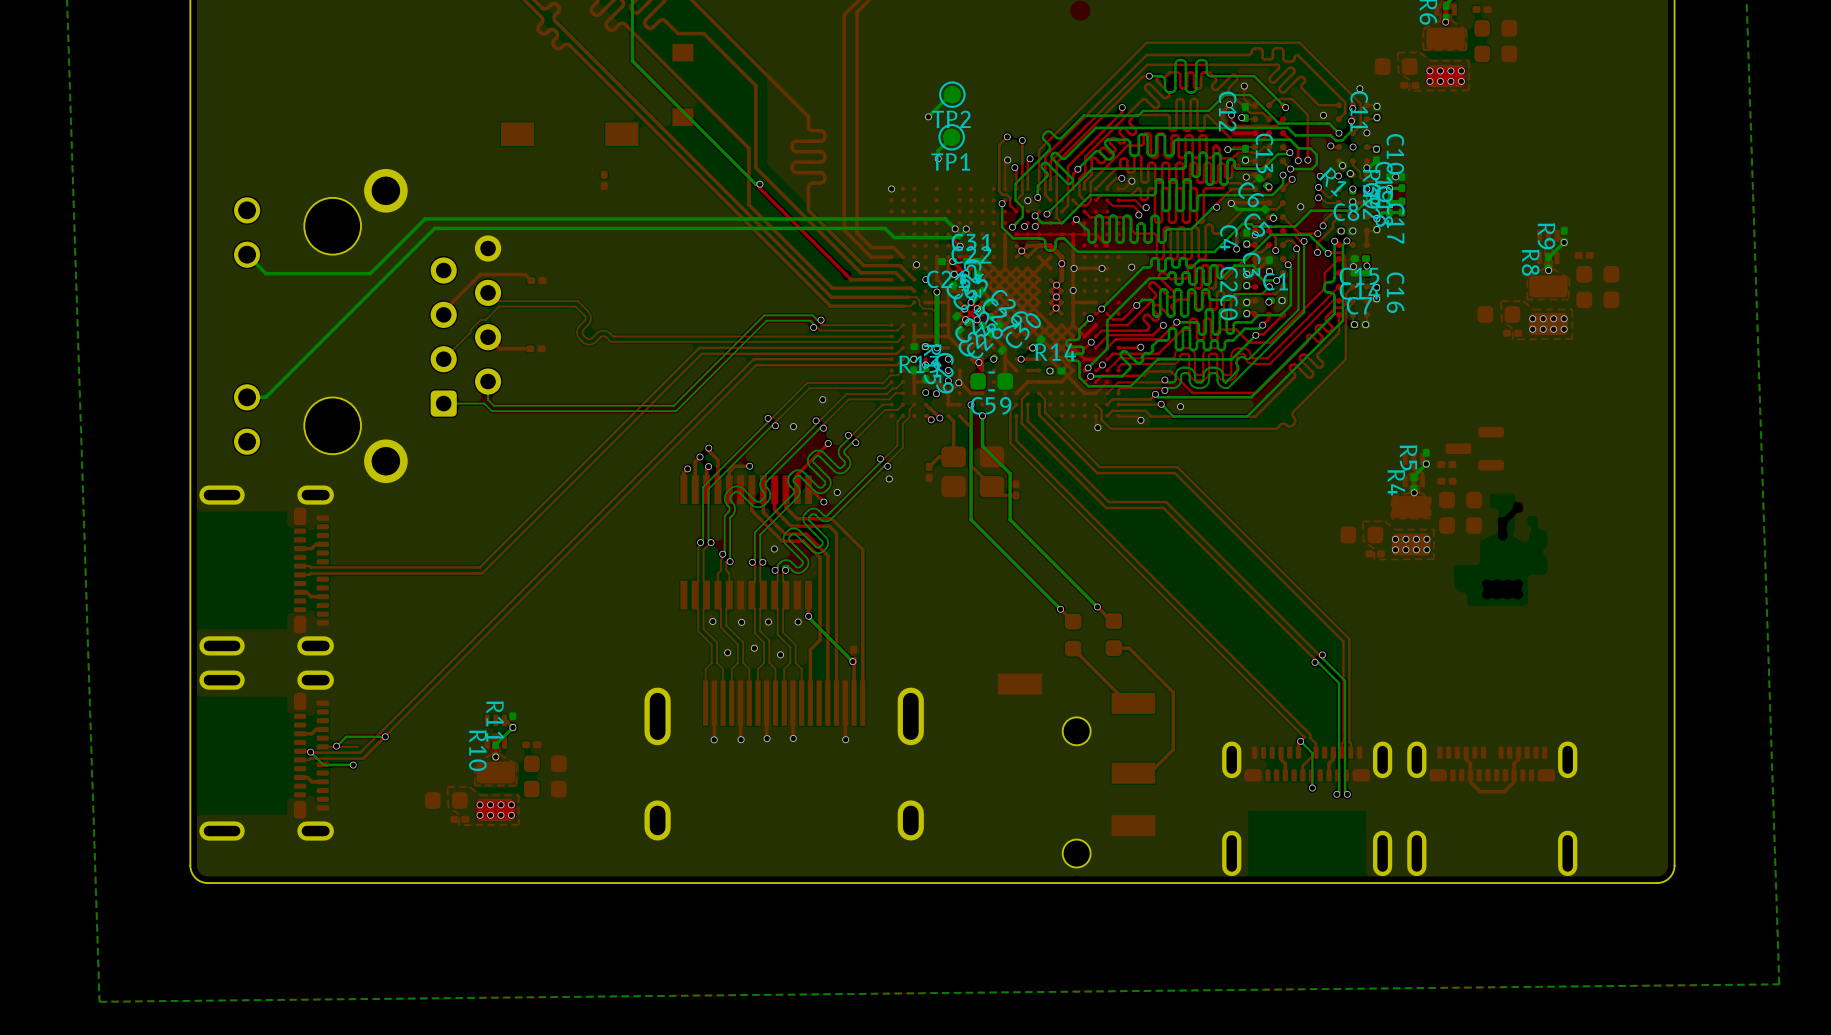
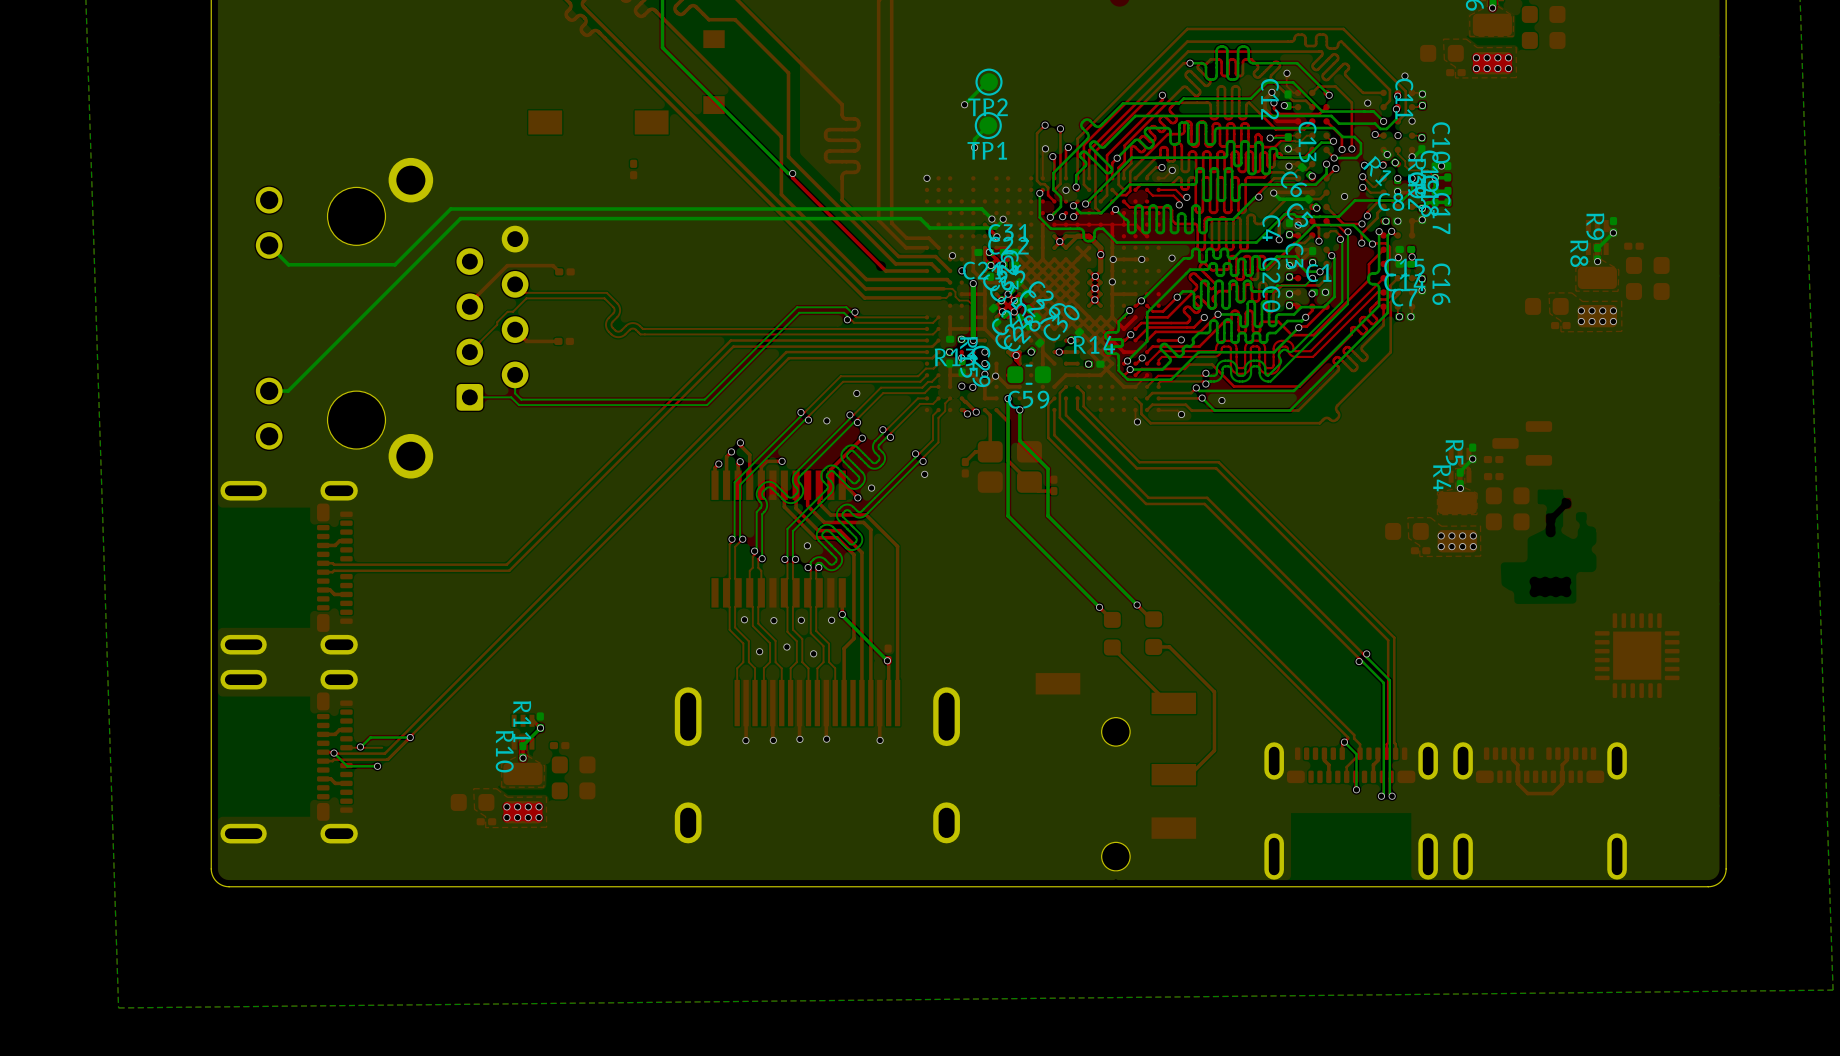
part: none -> (1637, 655)

